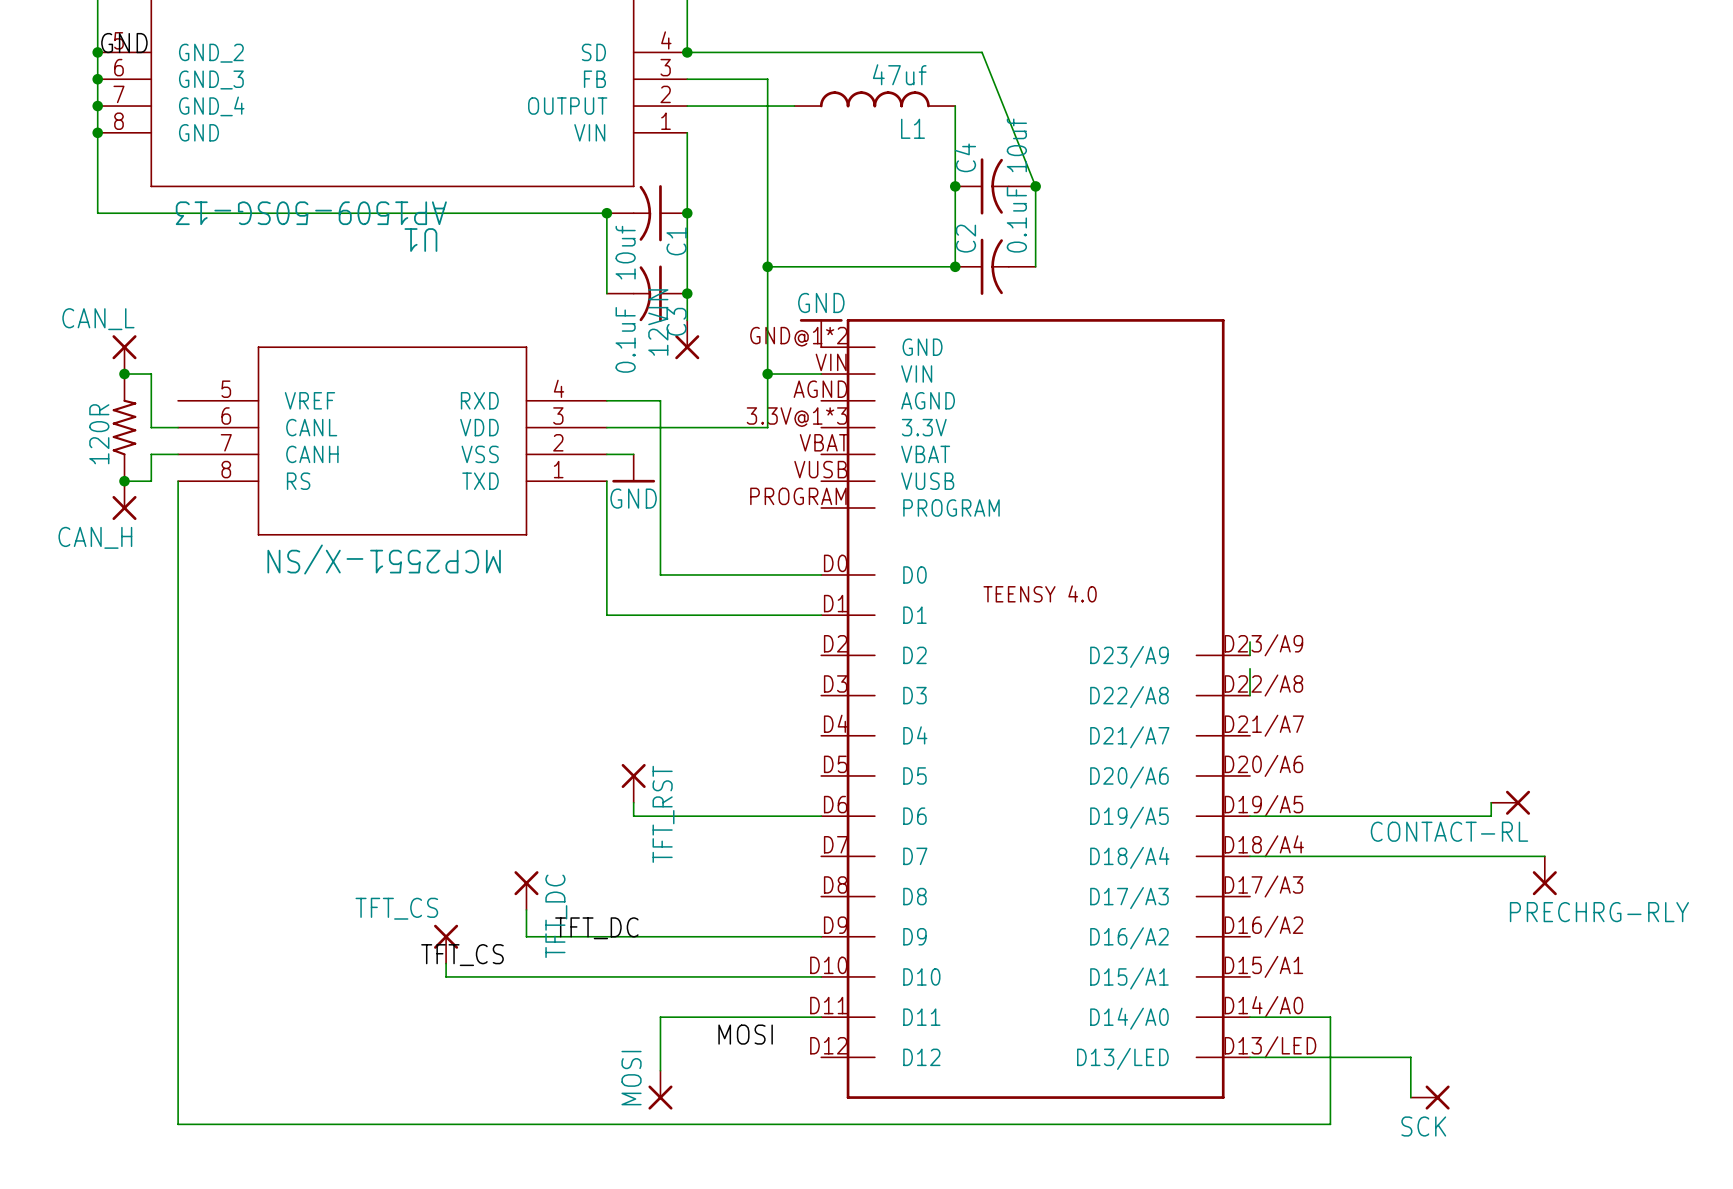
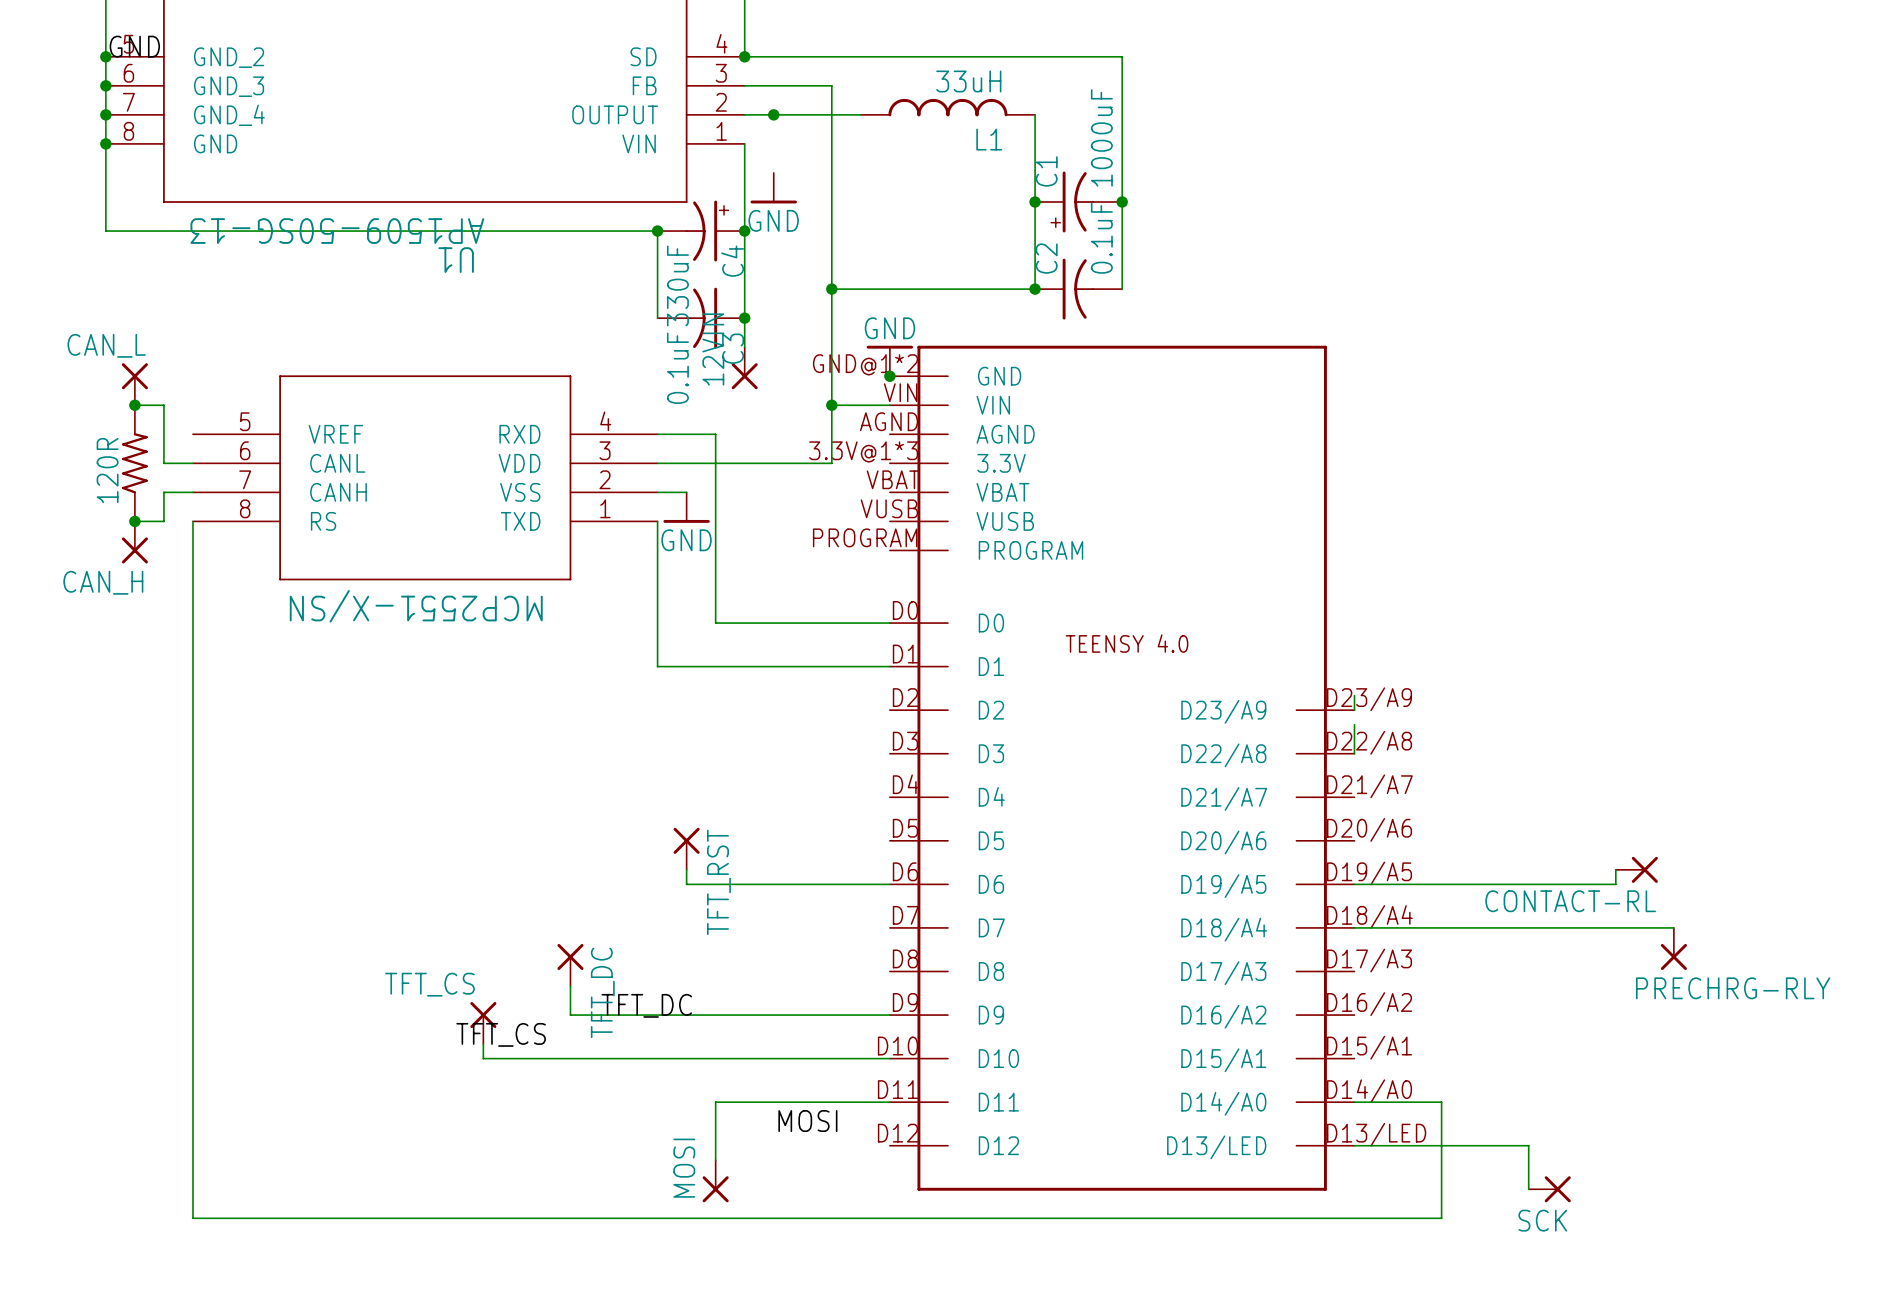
wire: (982, 52) (1035, 186) -> (1064, 56) (1122, 56) (1122, 201)
L1 value: 47uf (899, 74) -> 33uH (968, 81)
junction: none -> (773, 114)
C4 value: 10uf (1016, 145) -> 330uF (677, 285)
C4 name position: C4 (965, 157) -> C4 (732, 261)
C4 symbol: [955, 158, 1036, 215] -> [657, 200, 745, 262]
power symbol: none -> GND (773, 188)
C1 symbol: [606, 185, 688, 242] -> [1035, 171, 1123, 233]
C1 name position: C1 (676, 241) -> C1 (1046, 171)
C1 value: 10uf (625, 252) -> 1000uF (1101, 137)
junction: none -> (889, 376)

